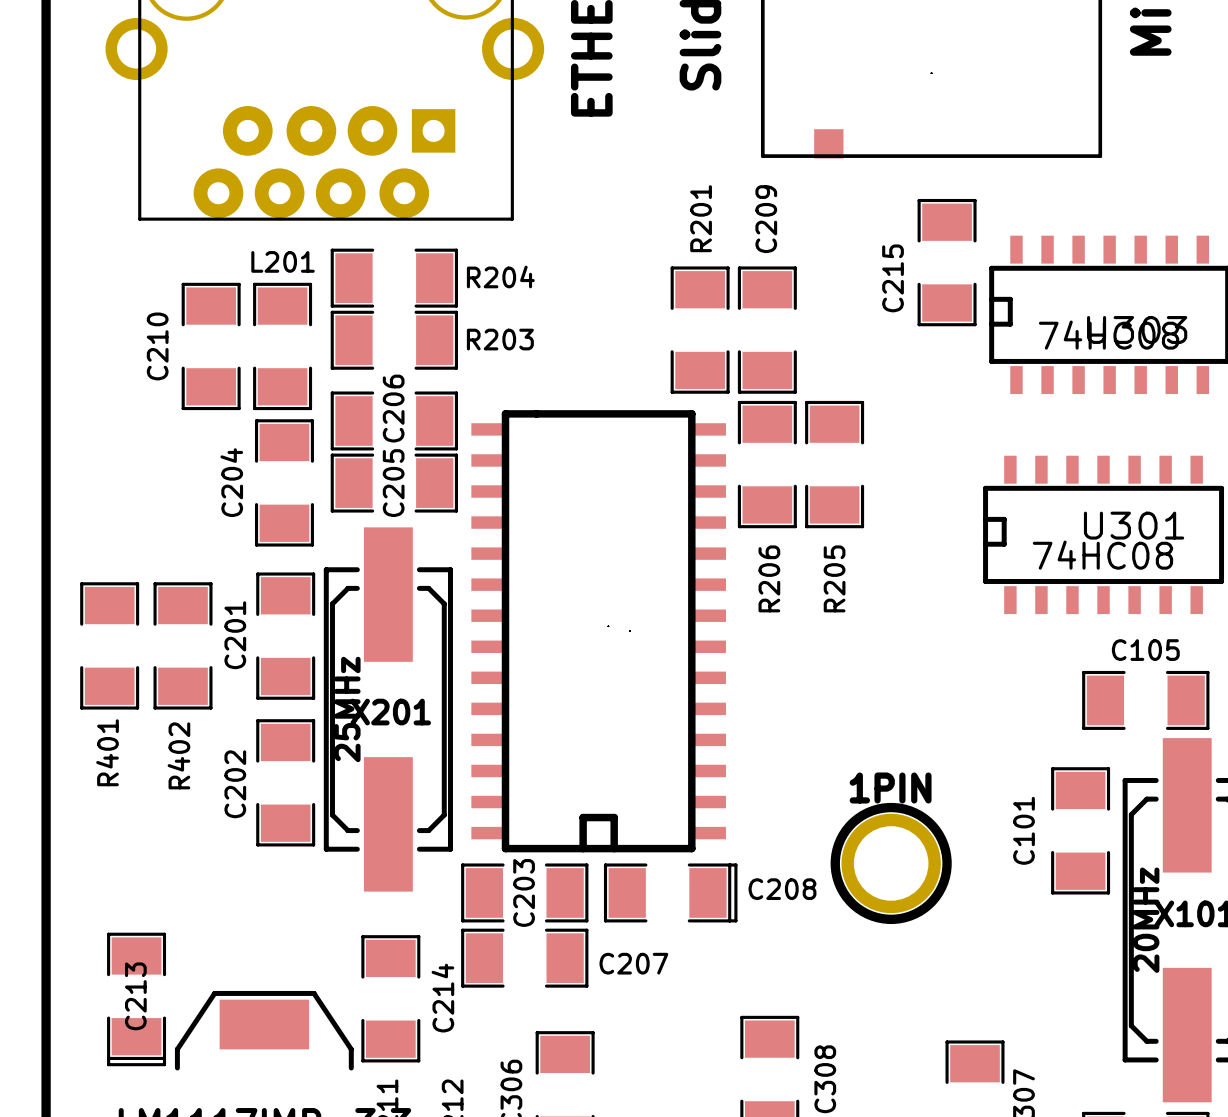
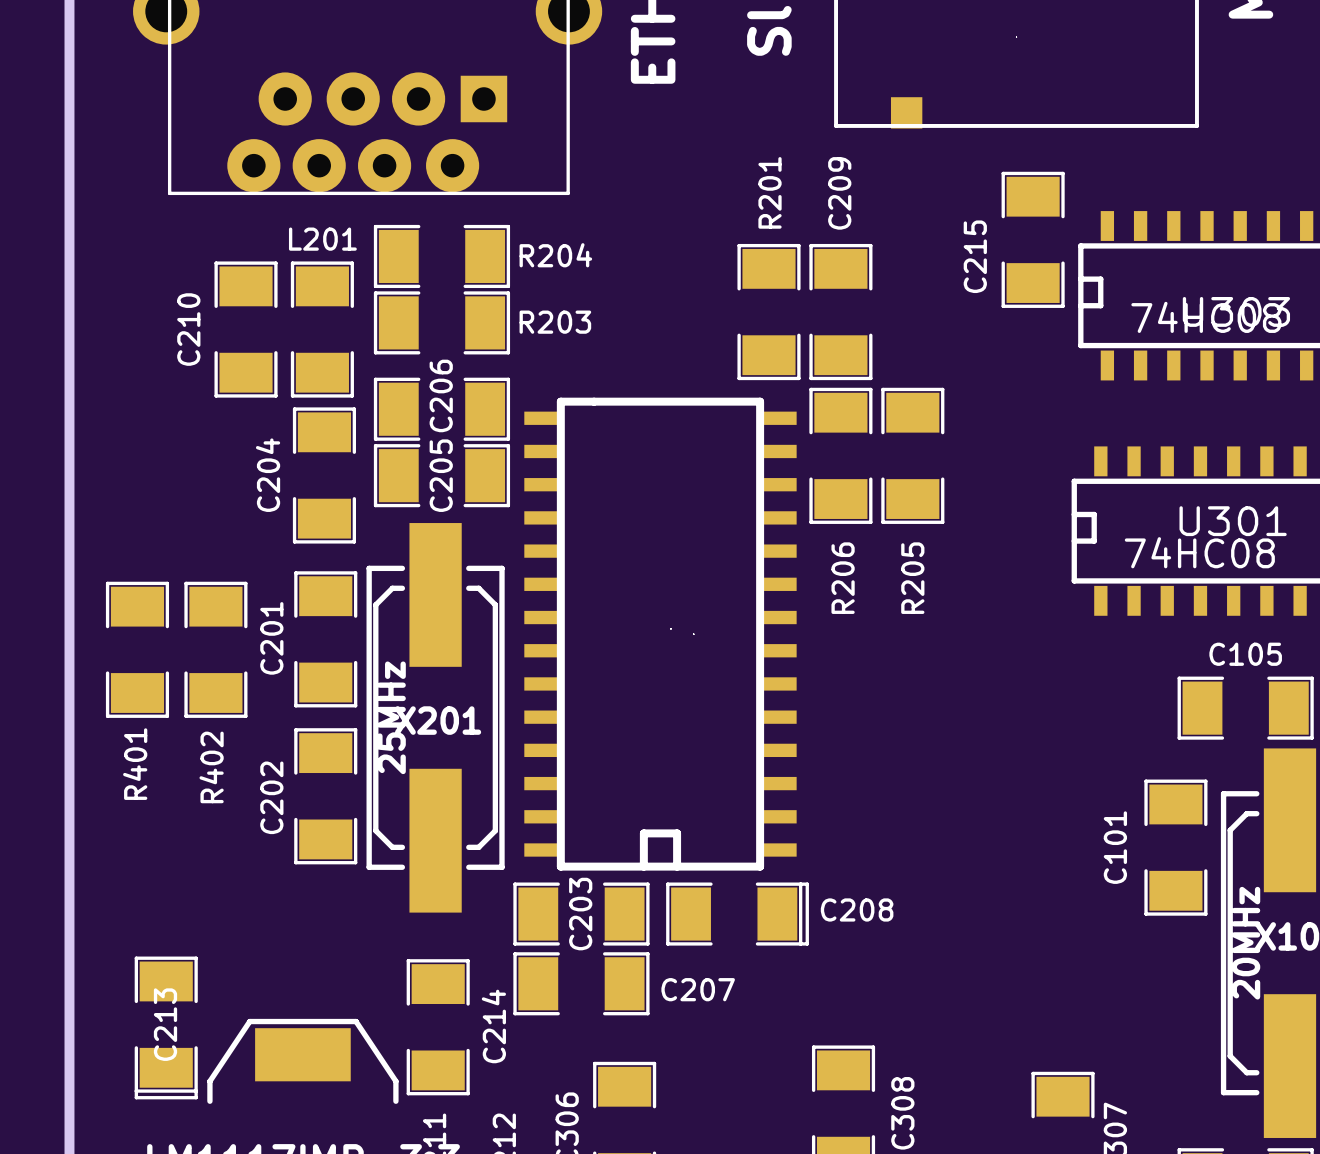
1PIN: (891, 863) -> none

